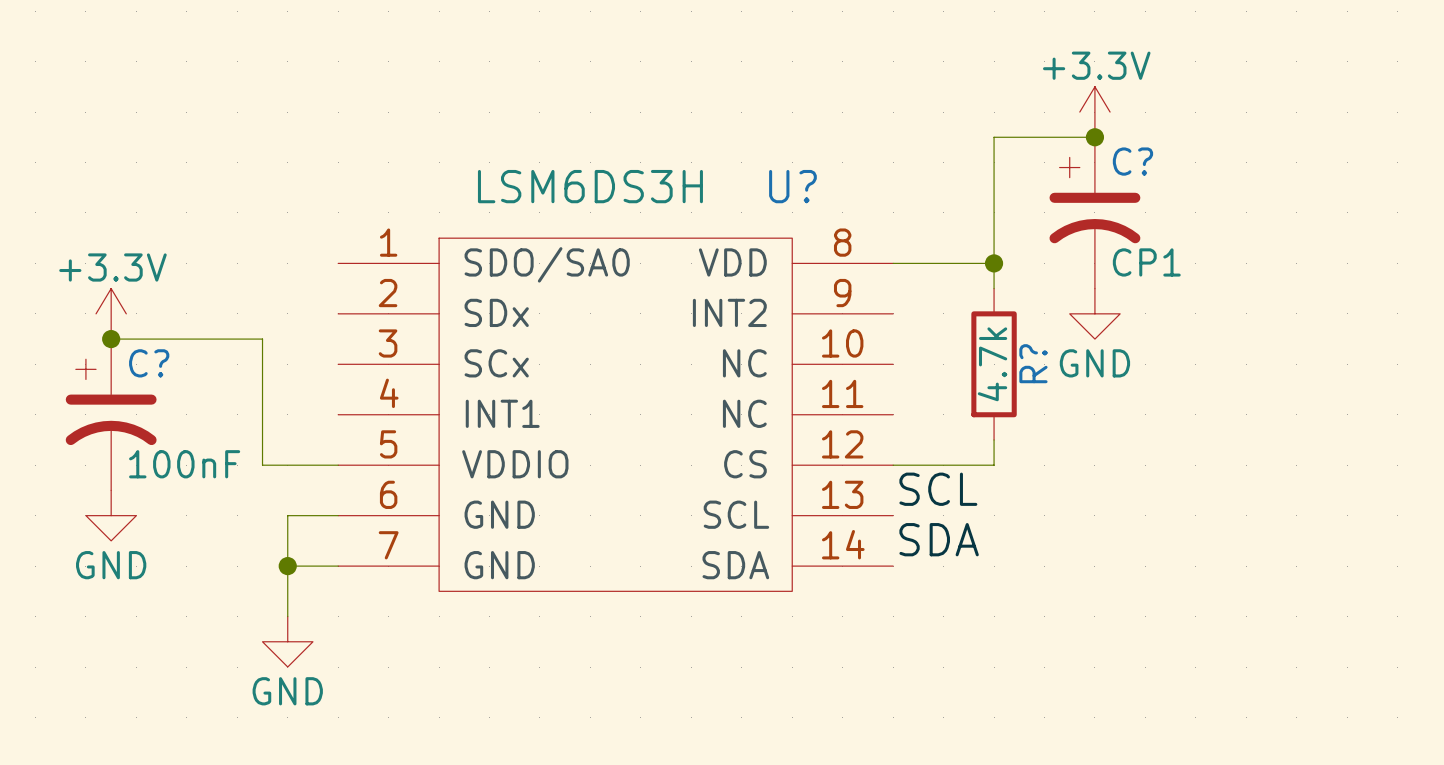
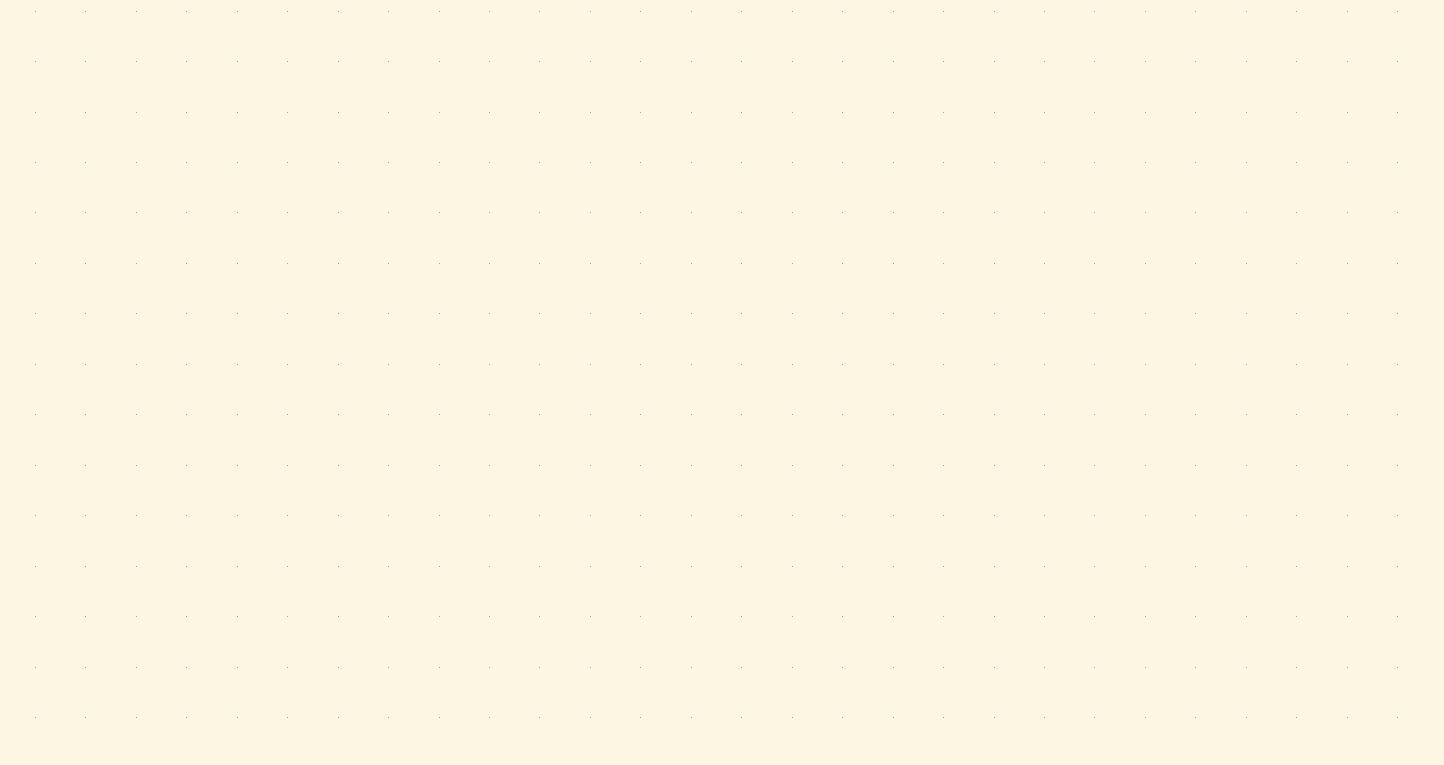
power symbol: +3.3V (1094, 112) -> none
wire: (1094, 137) (994, 137) (994, 288) -> none
junction: (1094, 137) -> none
C?: CP1 (1094, 212) -> none
wire: (893, 263) (994, 263) -> none
junction: (994, 263) -> none
power symbol: +3.3V (111, 313) -> none
power symbol: GND (1094, 313) -> none
wire: (111, 339) (262, 339) (262, 465) (338, 465) -> none
junction: (111, 339) -> none
R?: 4.7k (994, 364) -> none
C?: 100nF (111, 414) -> none
U?: LSM6DS3H (615, 414) -> none
wire: (994, 439) (994, 465) (893, 465) -> none
label: SCL (938, 489) -> none
power symbol: GND (111, 515) -> none
wire: (338, 515) (287, 515) (287, 616) -> none
label: SDA (939, 539) -> none
wire: (287, 566) (338, 566) -> none
junction: (287, 566) -> none
power symbol: GND (287, 641) -> none

